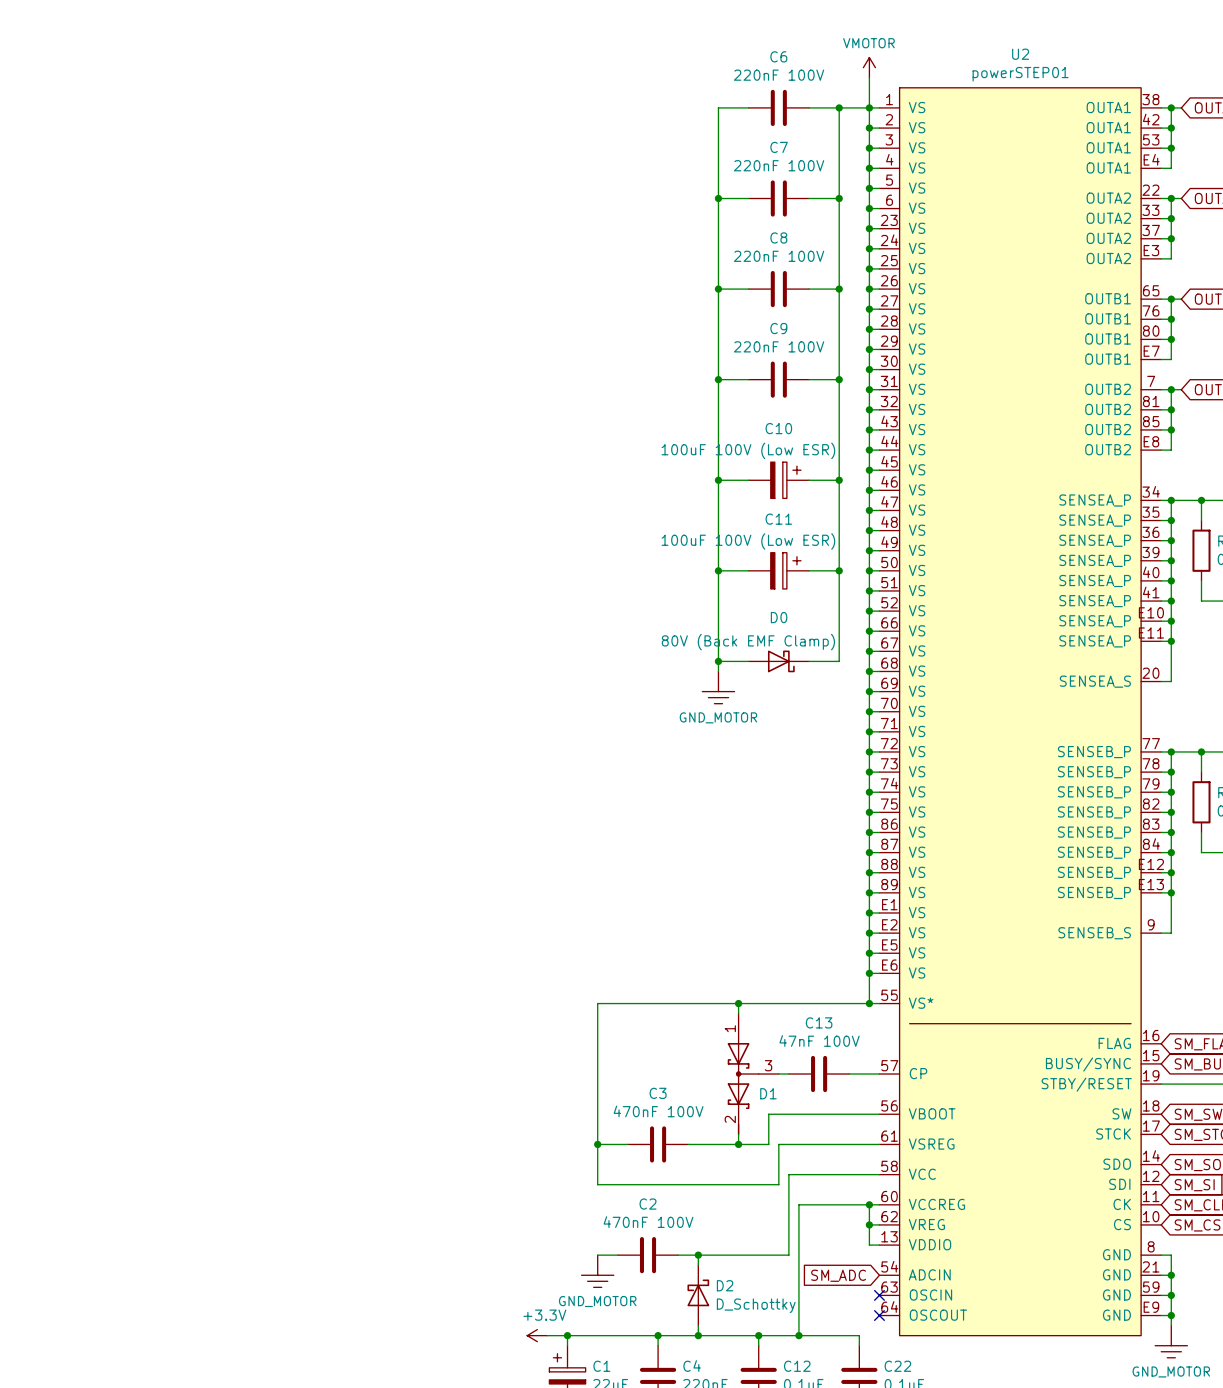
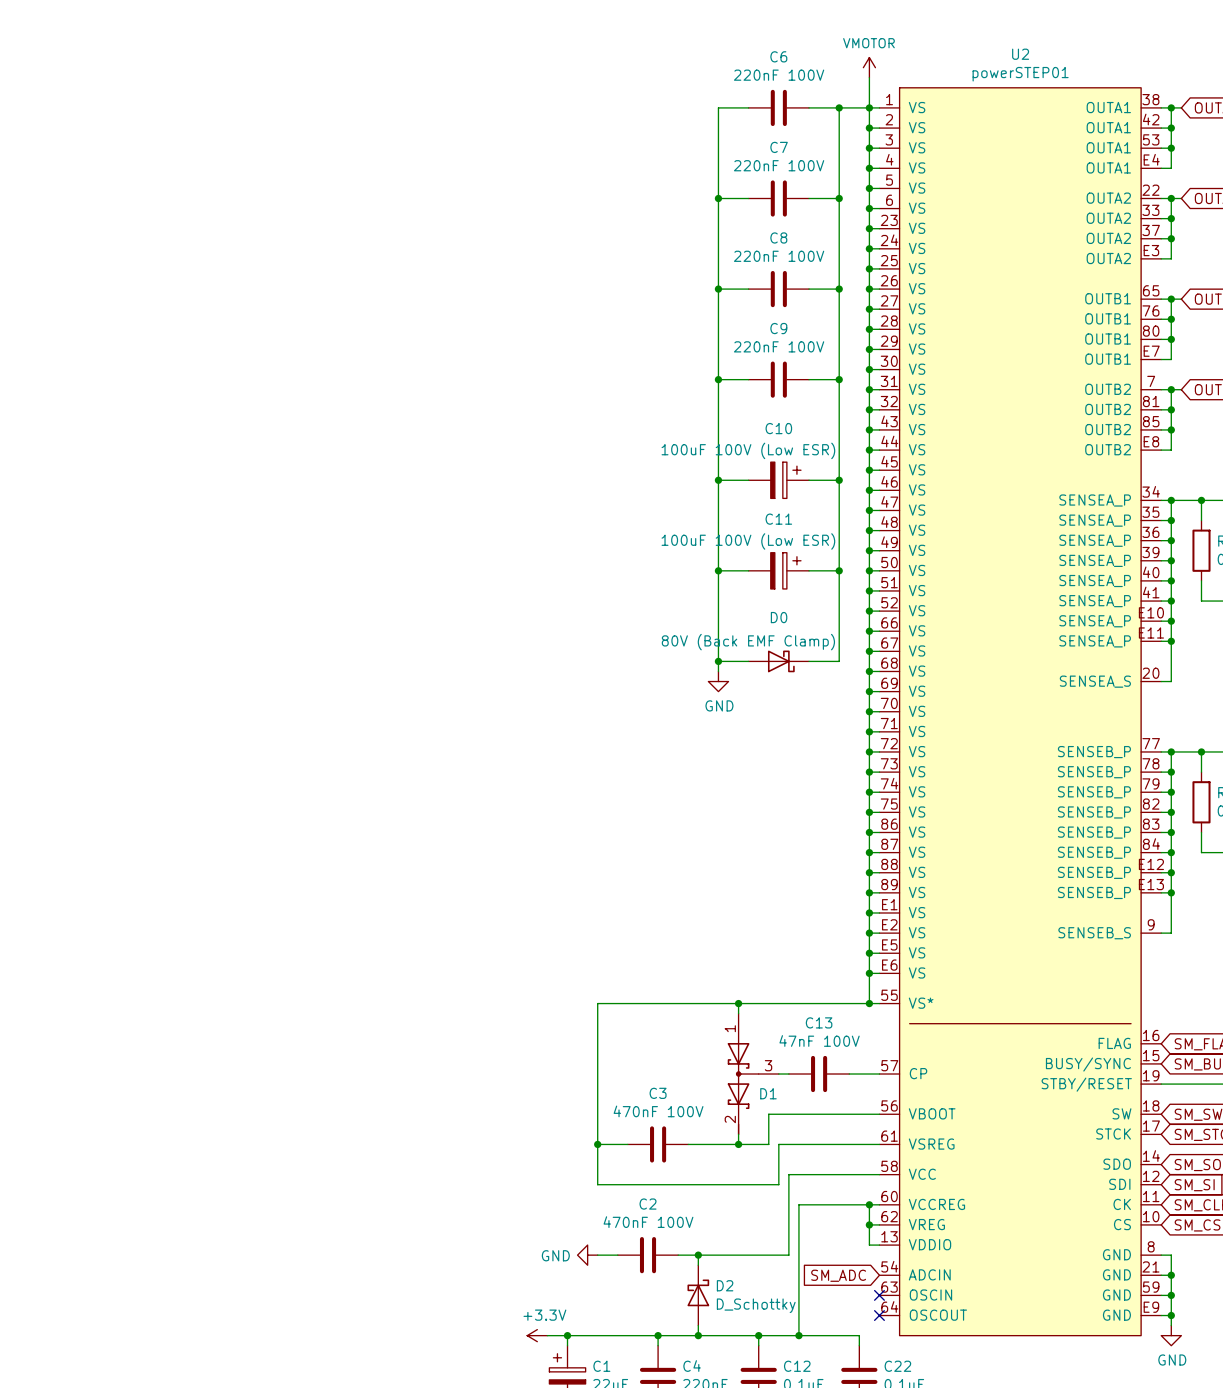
power symbol: GND_MOTOR (718, 687) -> GND (718, 681)
power symbol: none -> GND (587, 1255)
power symbol: GND_MOTOR (597, 1271) -> none
power symbol: GND_MOTOR (1171, 1341) -> GND (1171, 1335)

